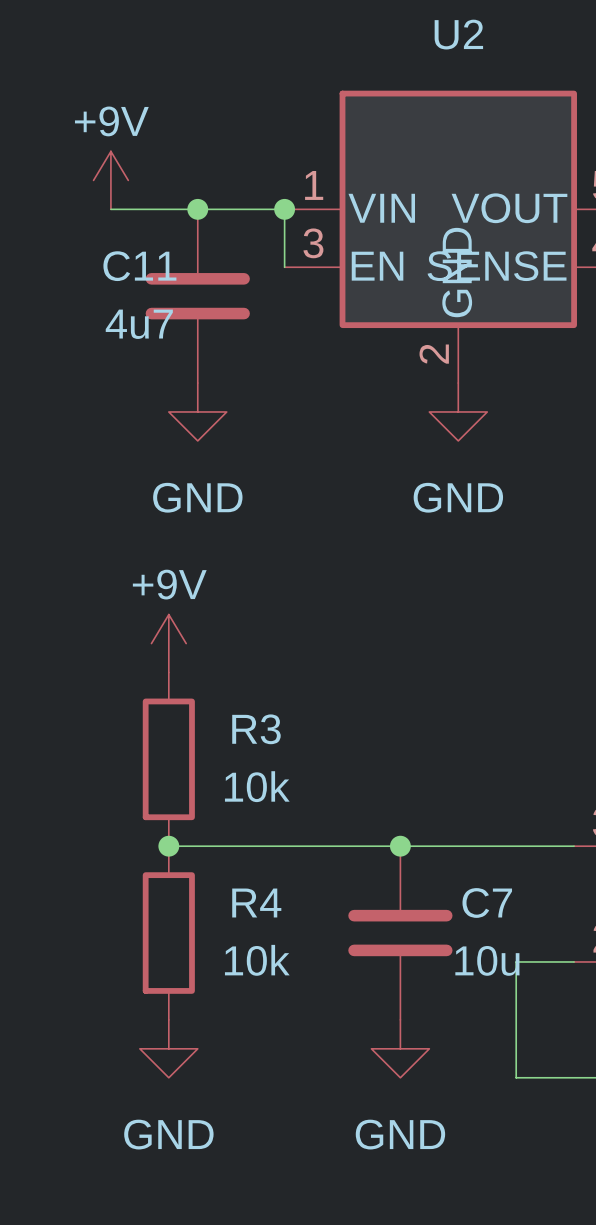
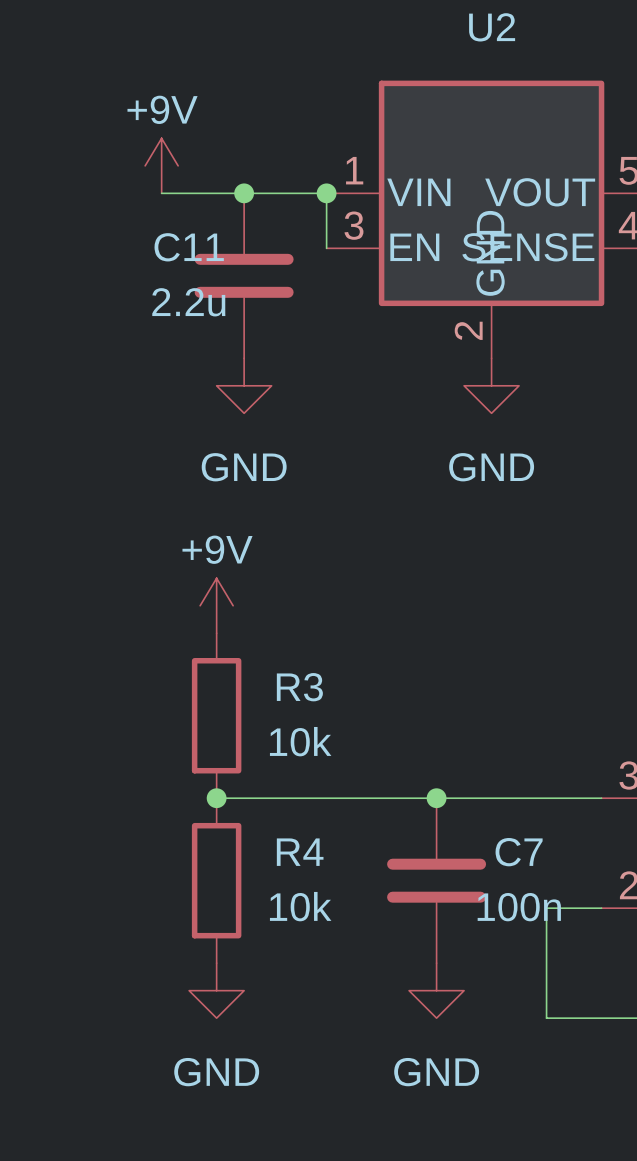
C11 value: 4u7 (139, 324) -> 2.2u (188, 302)
C7 value: 10u (487, 960) -> 100n (519, 907)

